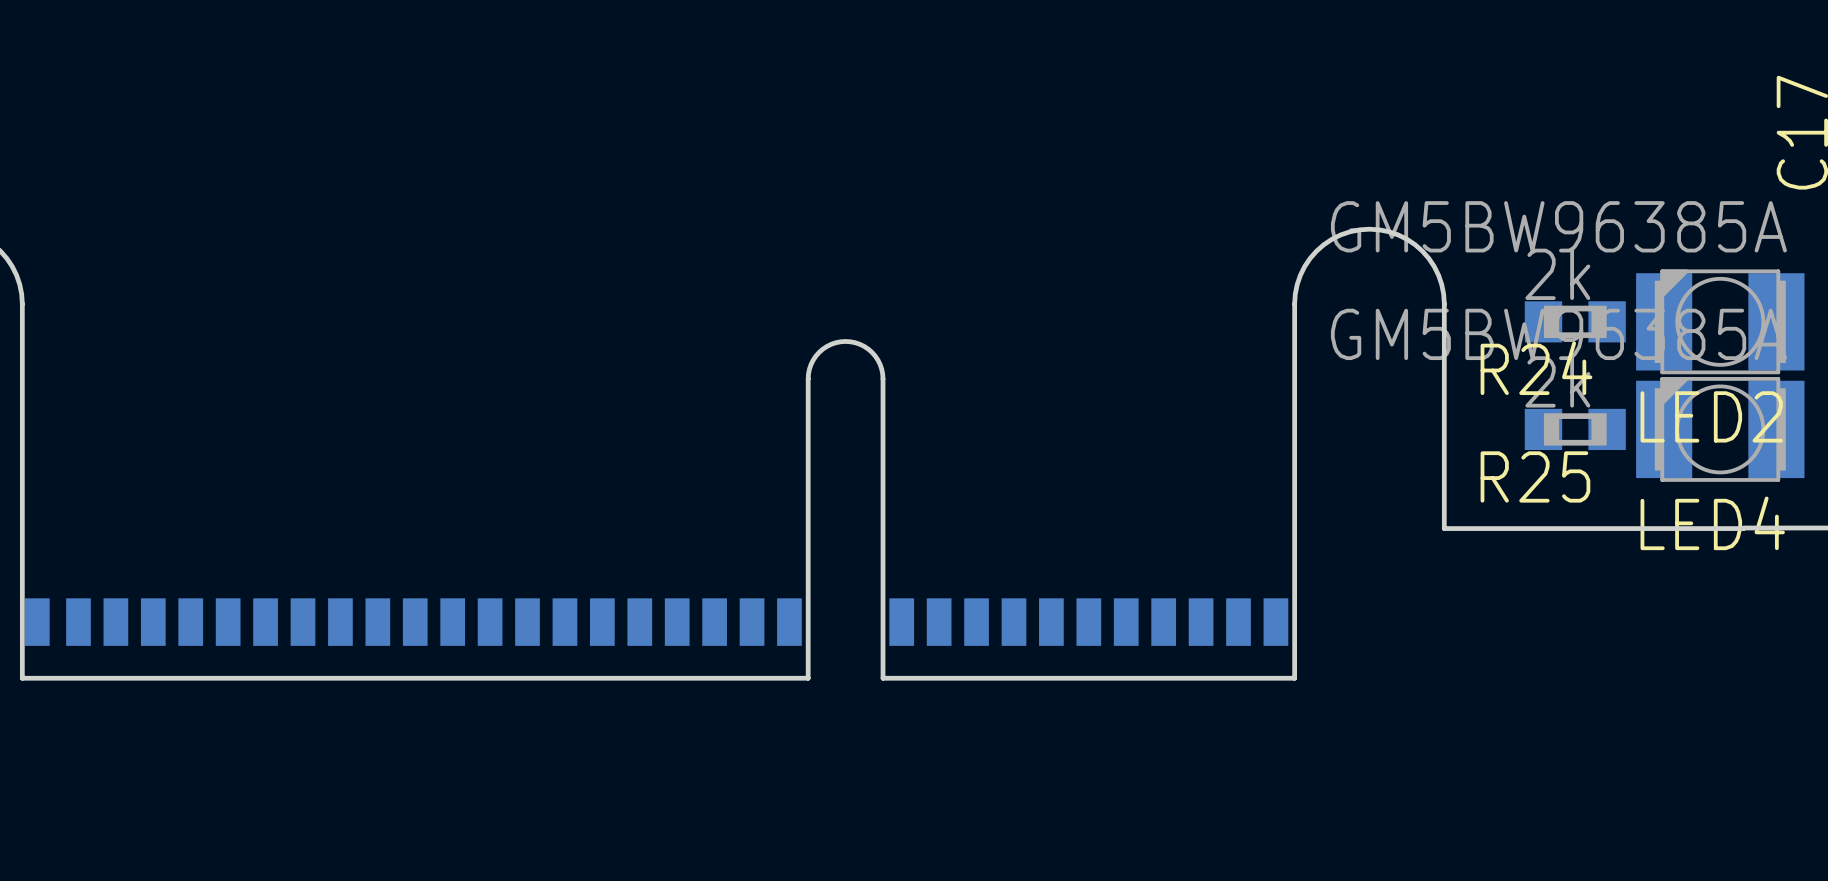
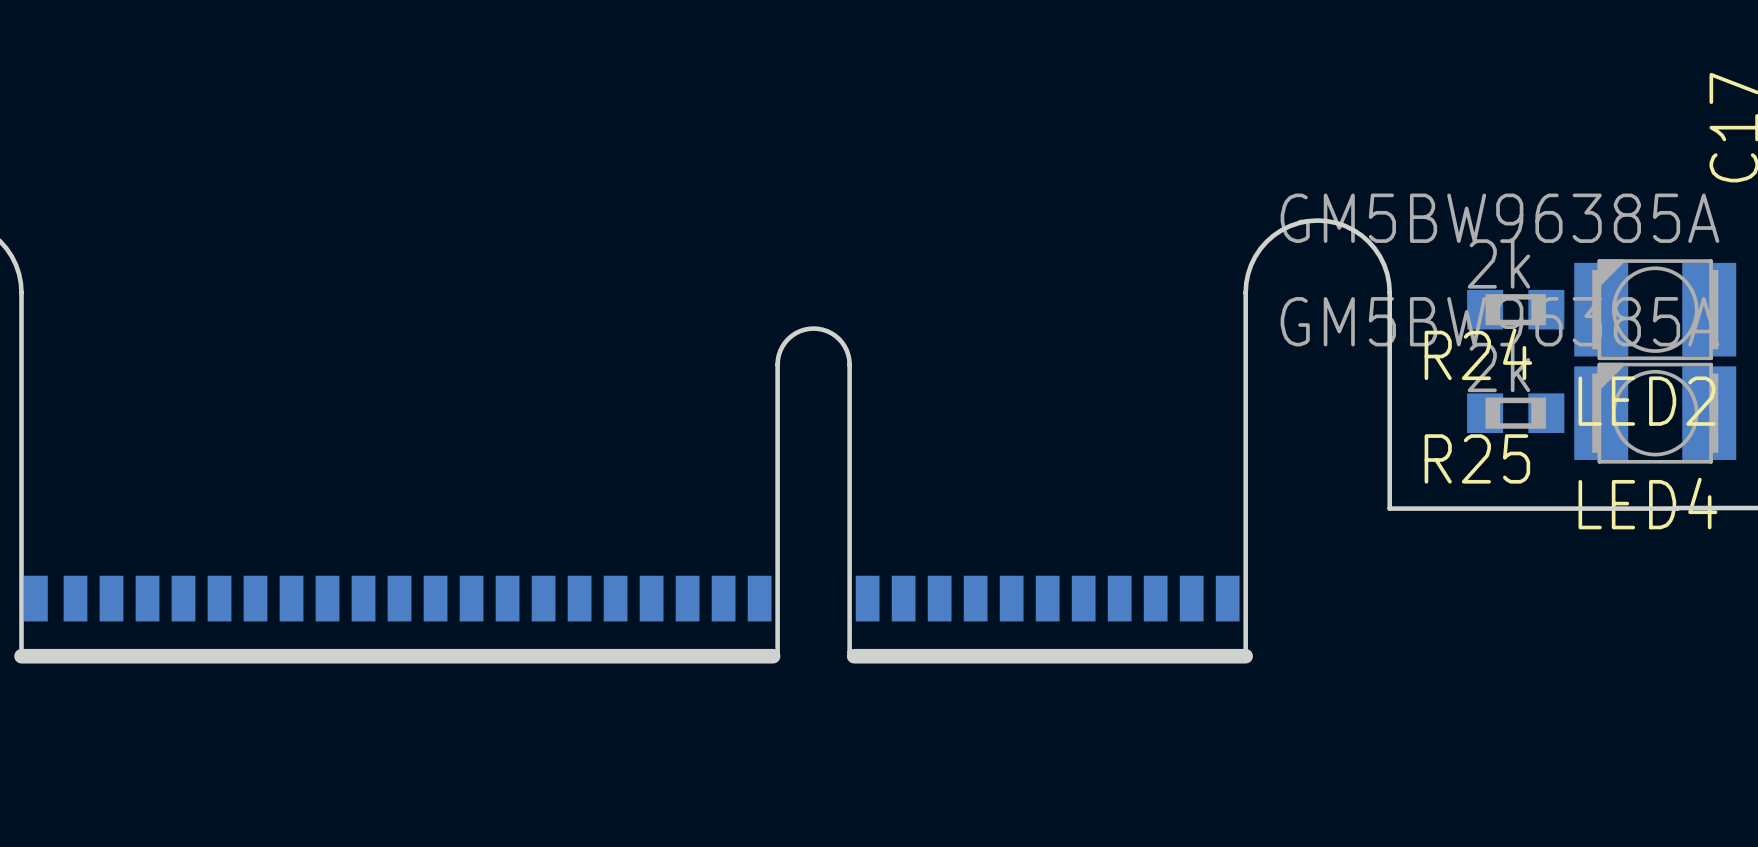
board edge: none -> (773, 656) (21, 656)
board edge: none -> (1245, 656) (854, 656)

